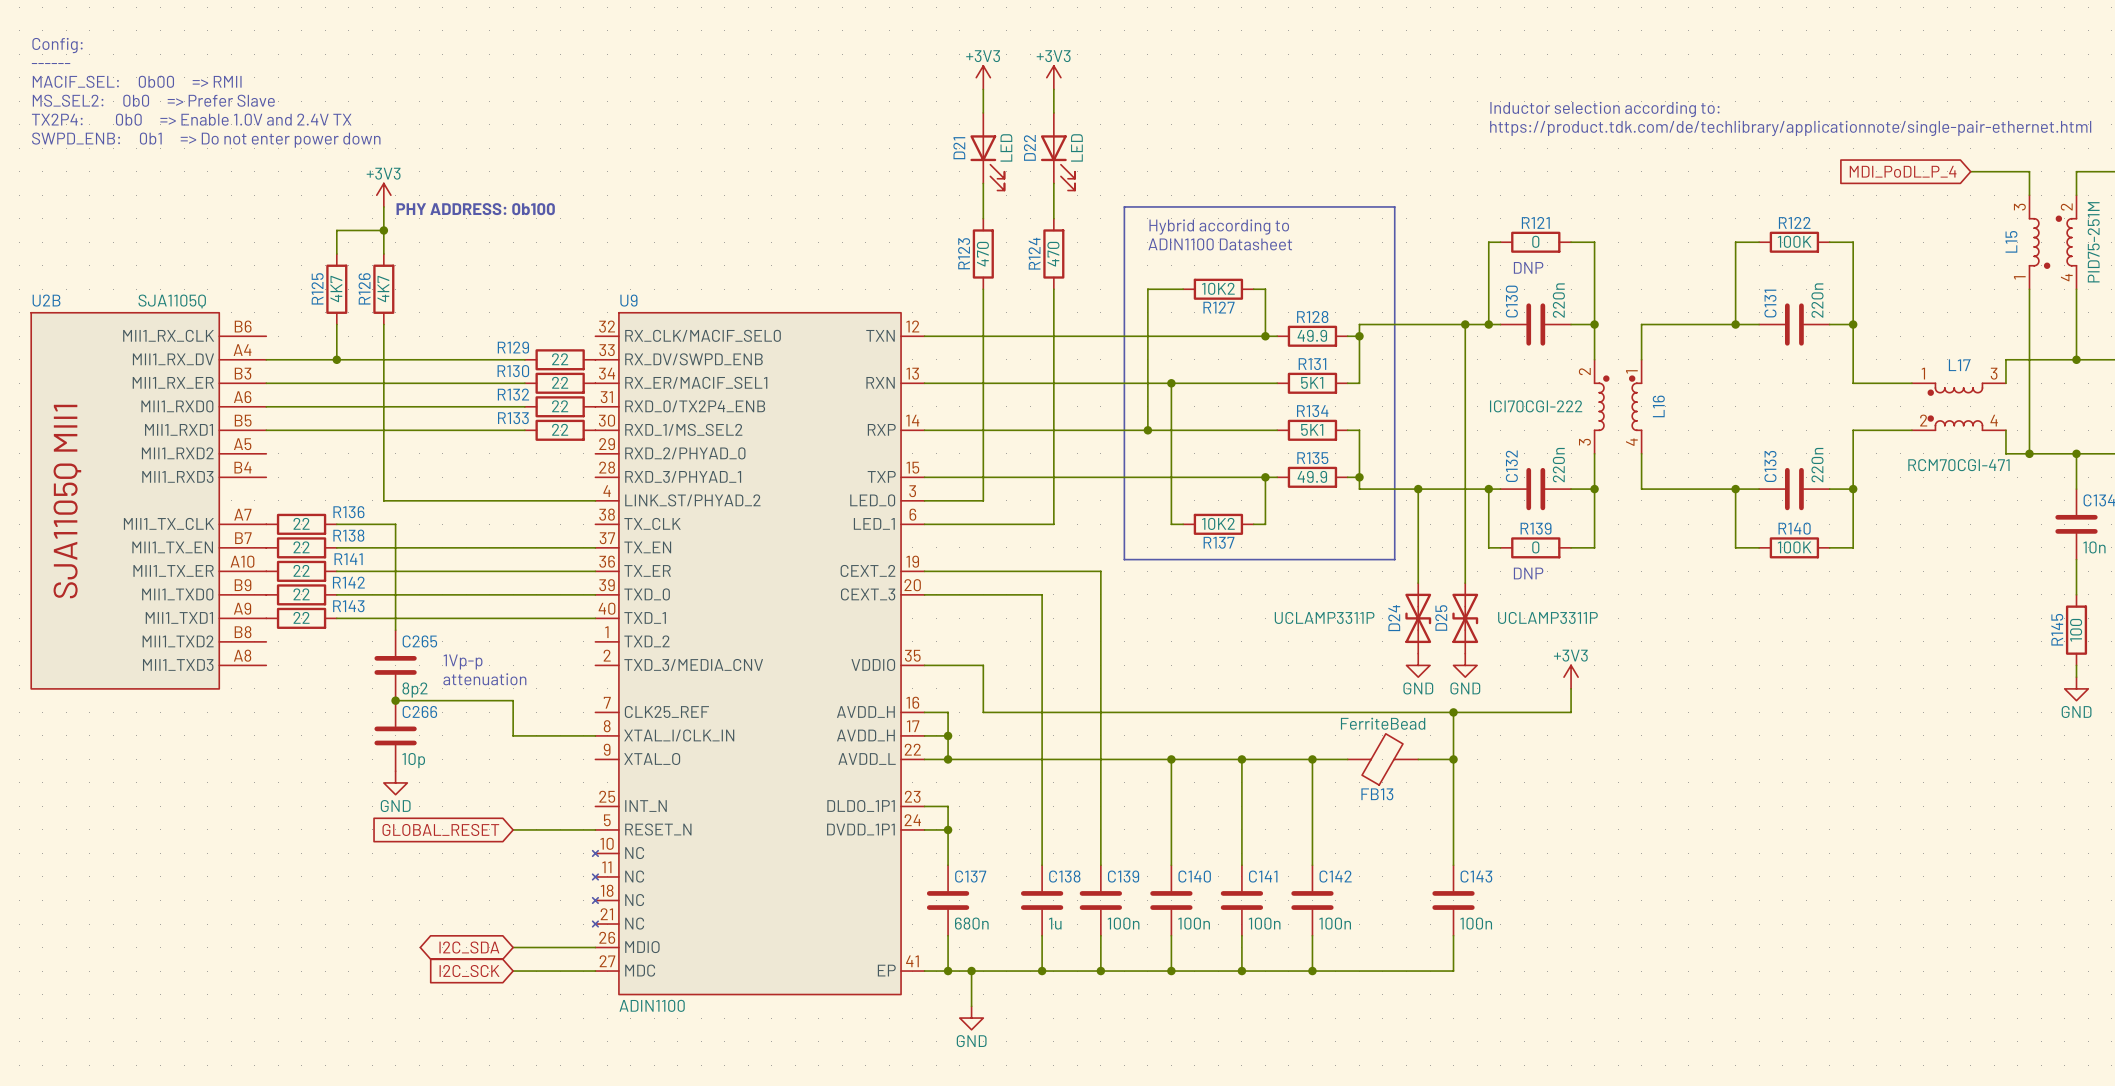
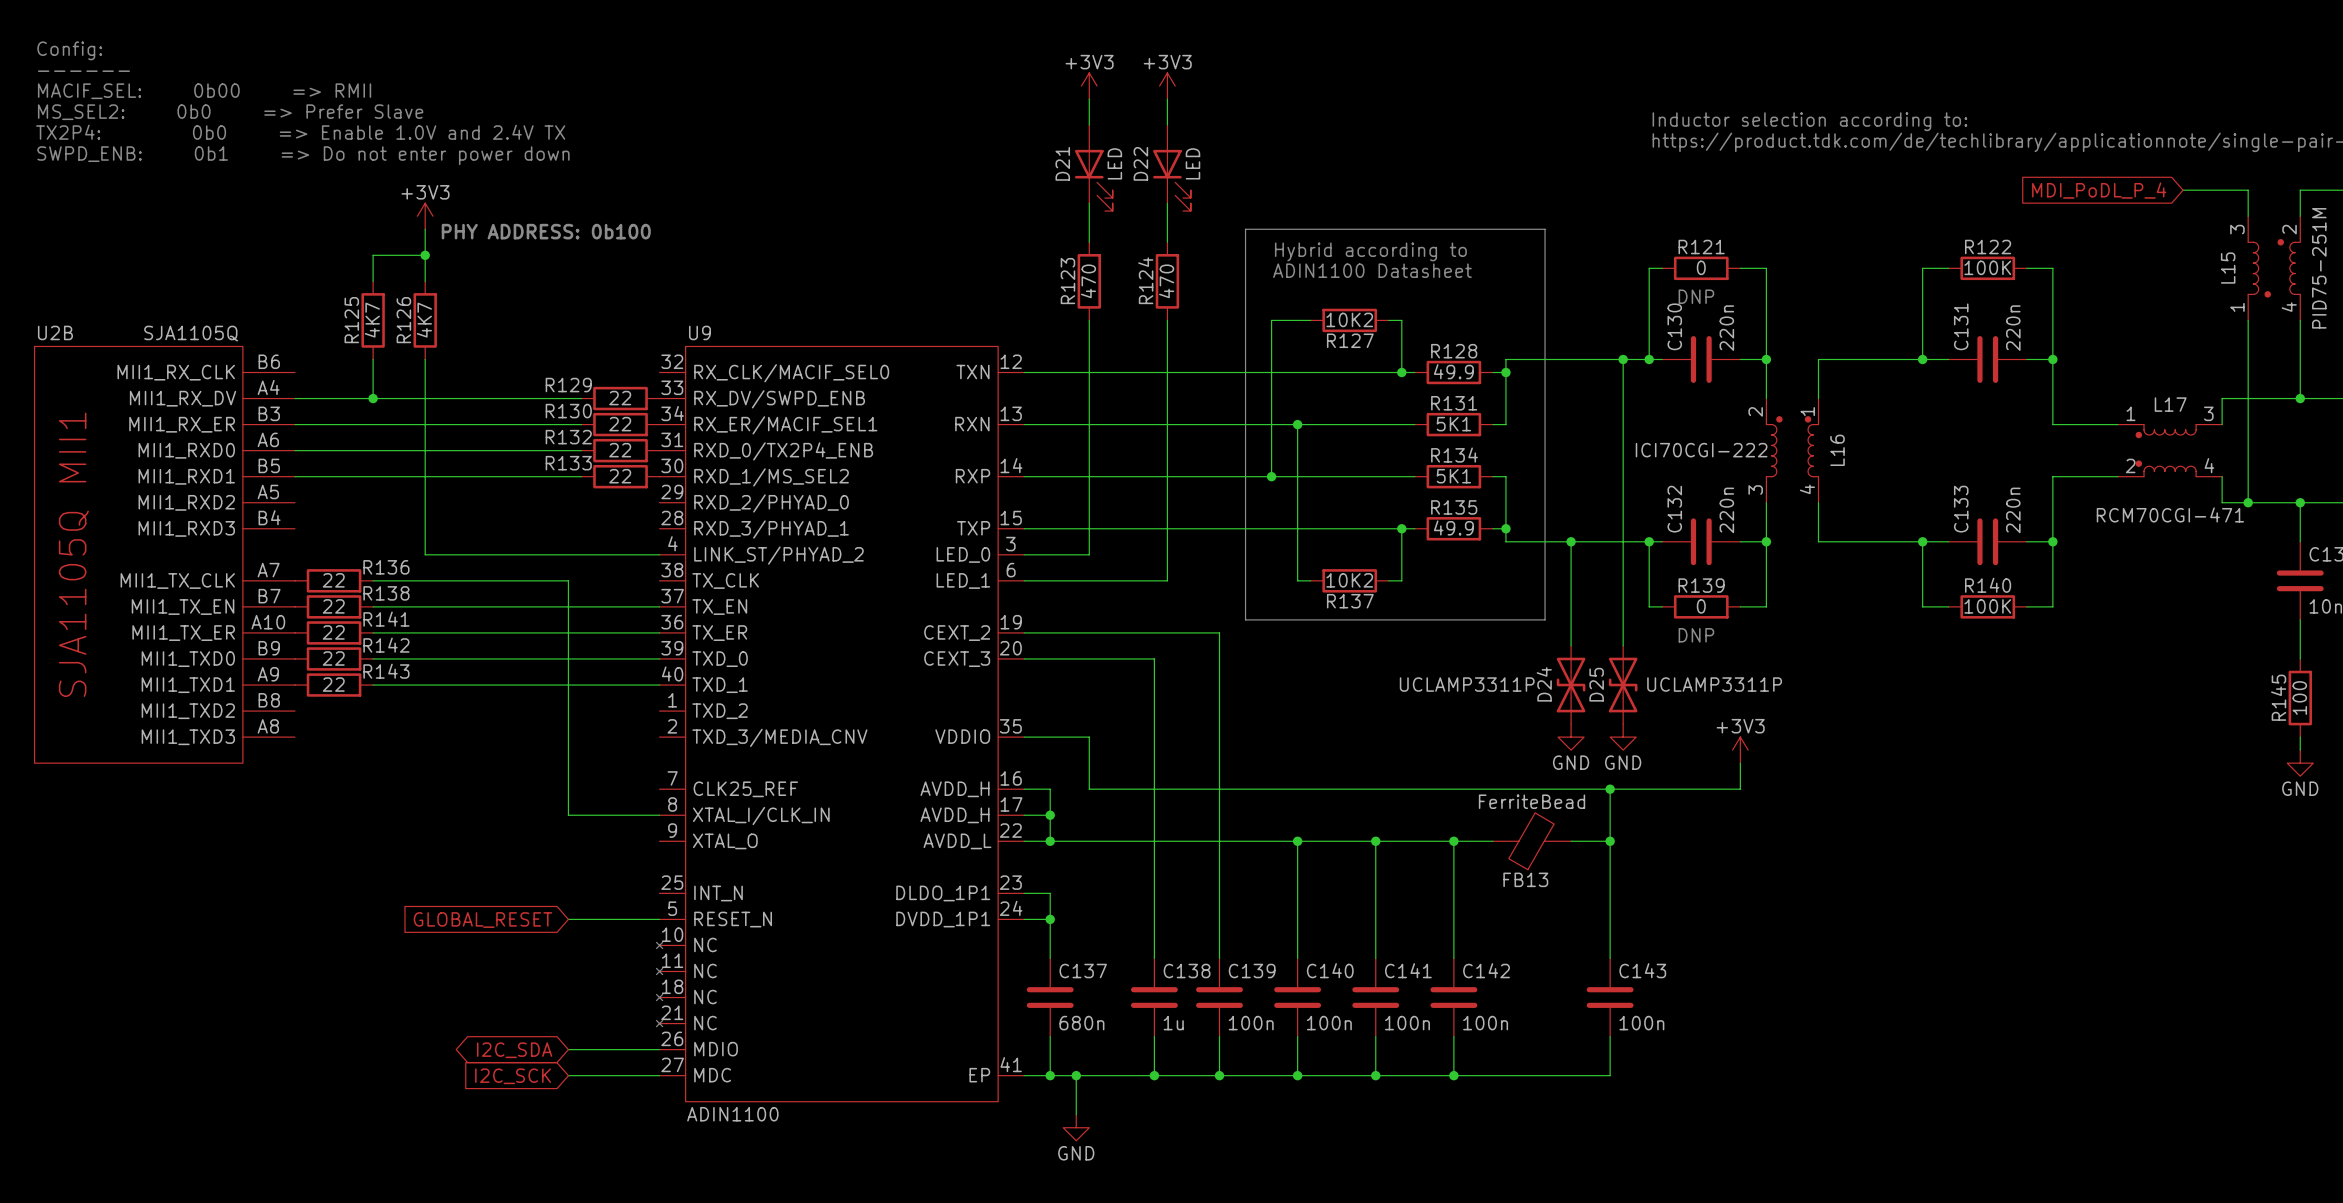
wire: (395, 524) (395, 630) -> (438, 580) (568, 580) (568, 776)
text: 1Vp-p (463, 661) -> none
C265: 8p2 (395, 665) -> none
text: attenuation (484, 679) -> none
wire: (395, 700) (513, 700) -> none
junction: (395, 700) -> none
C266: 10p (395, 735) -> none
power symbol: GND (395, 782) -> none

